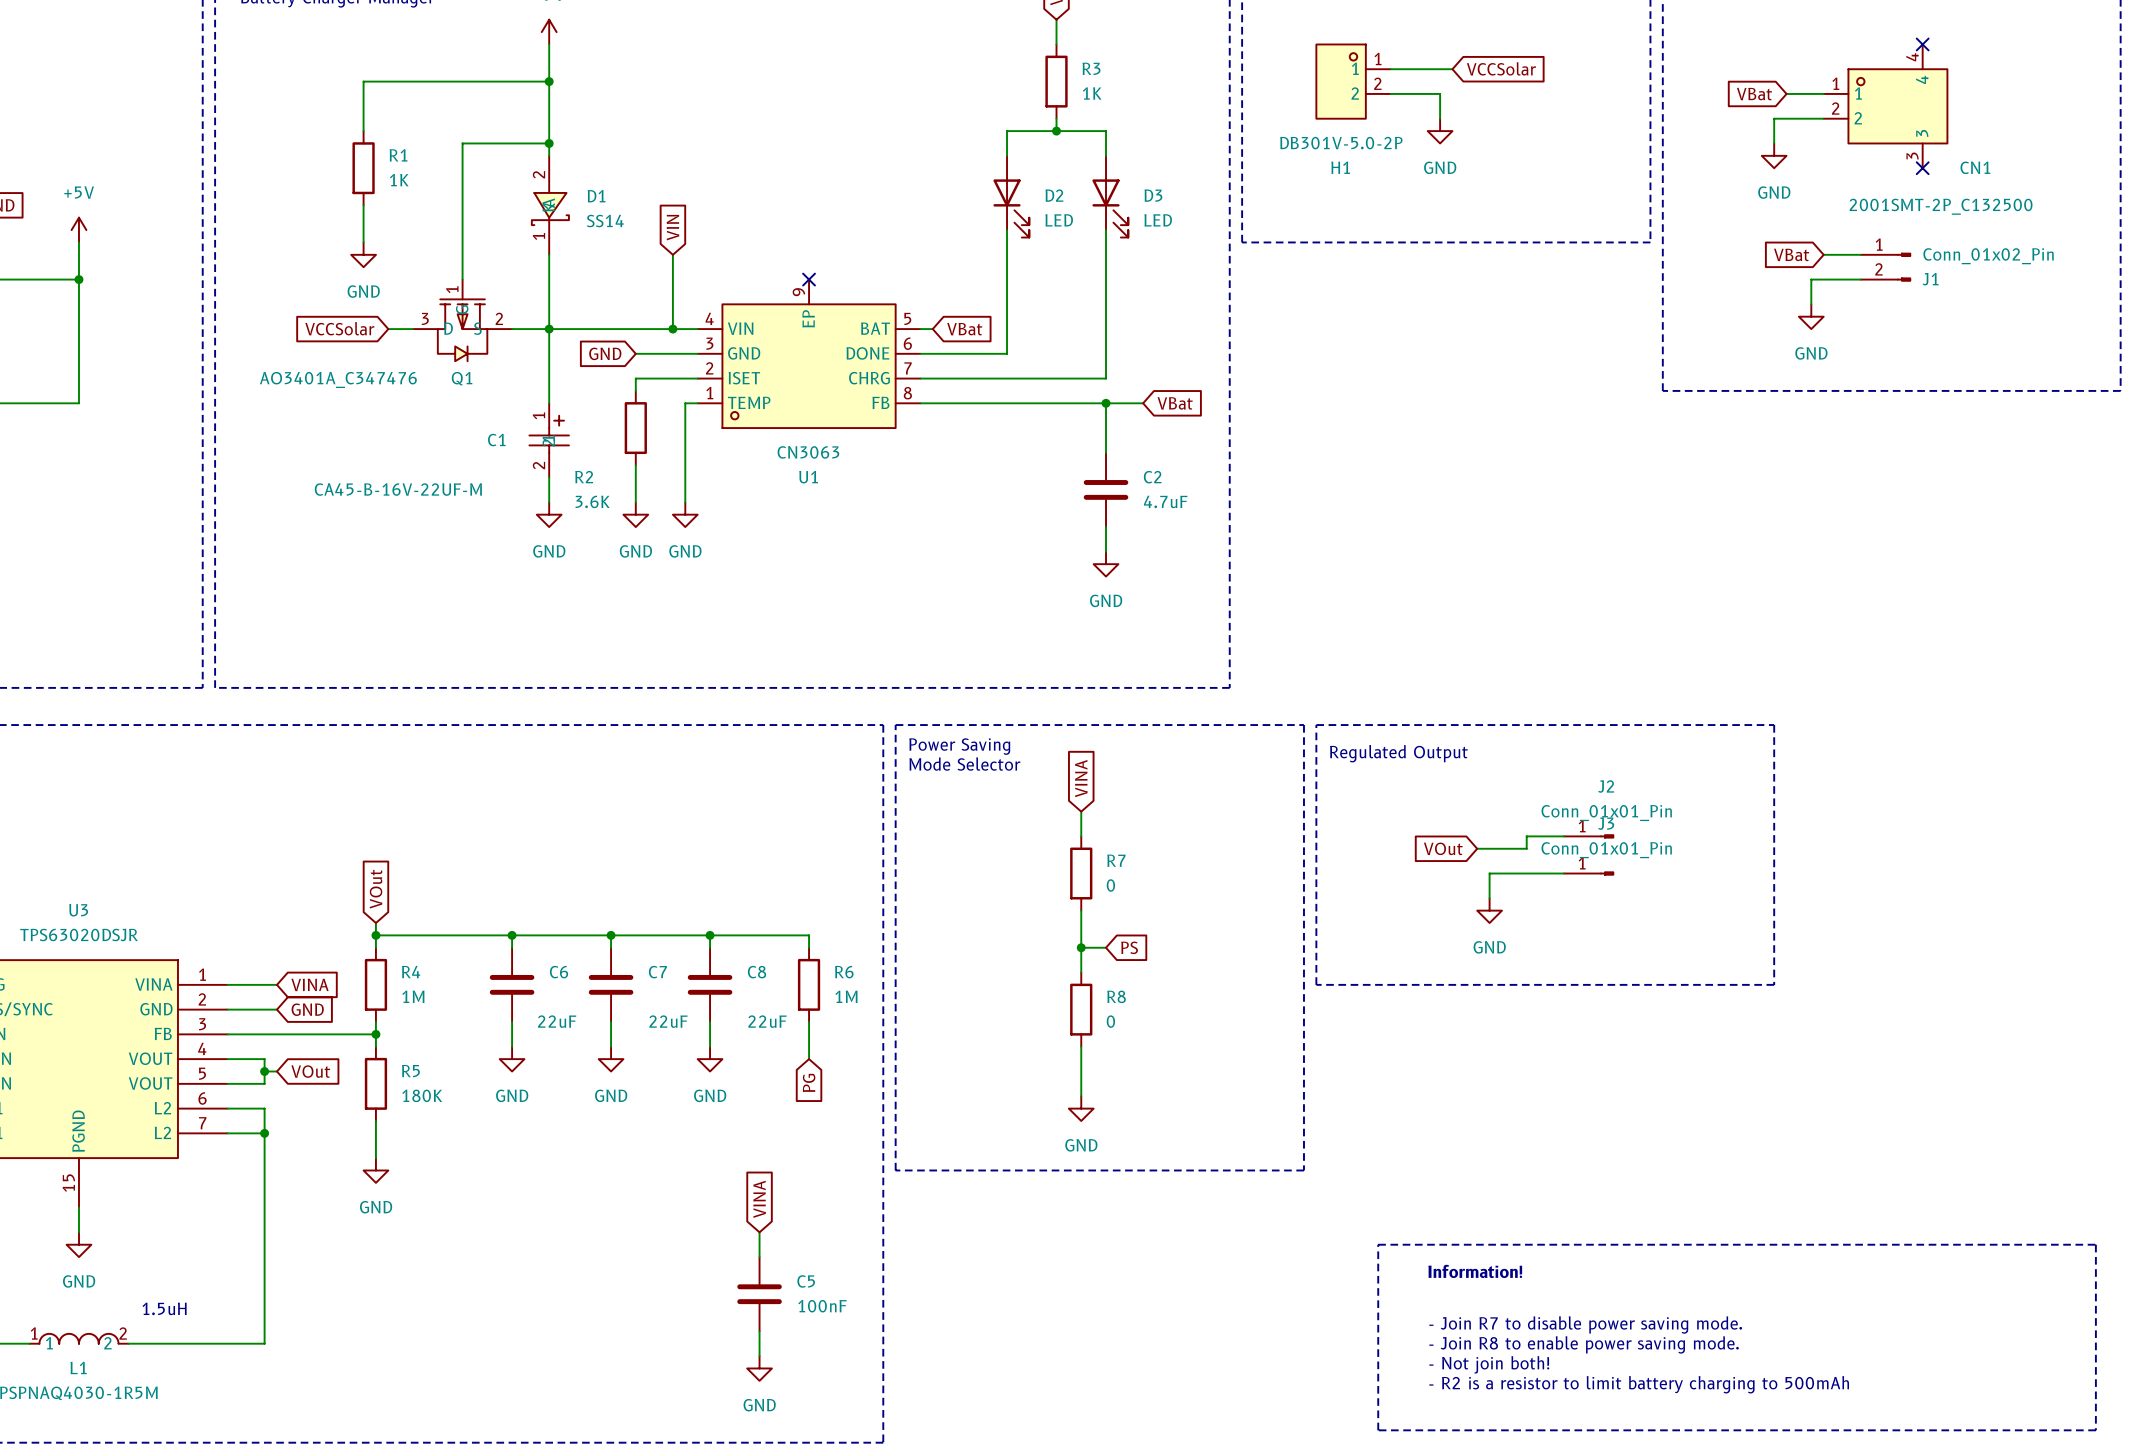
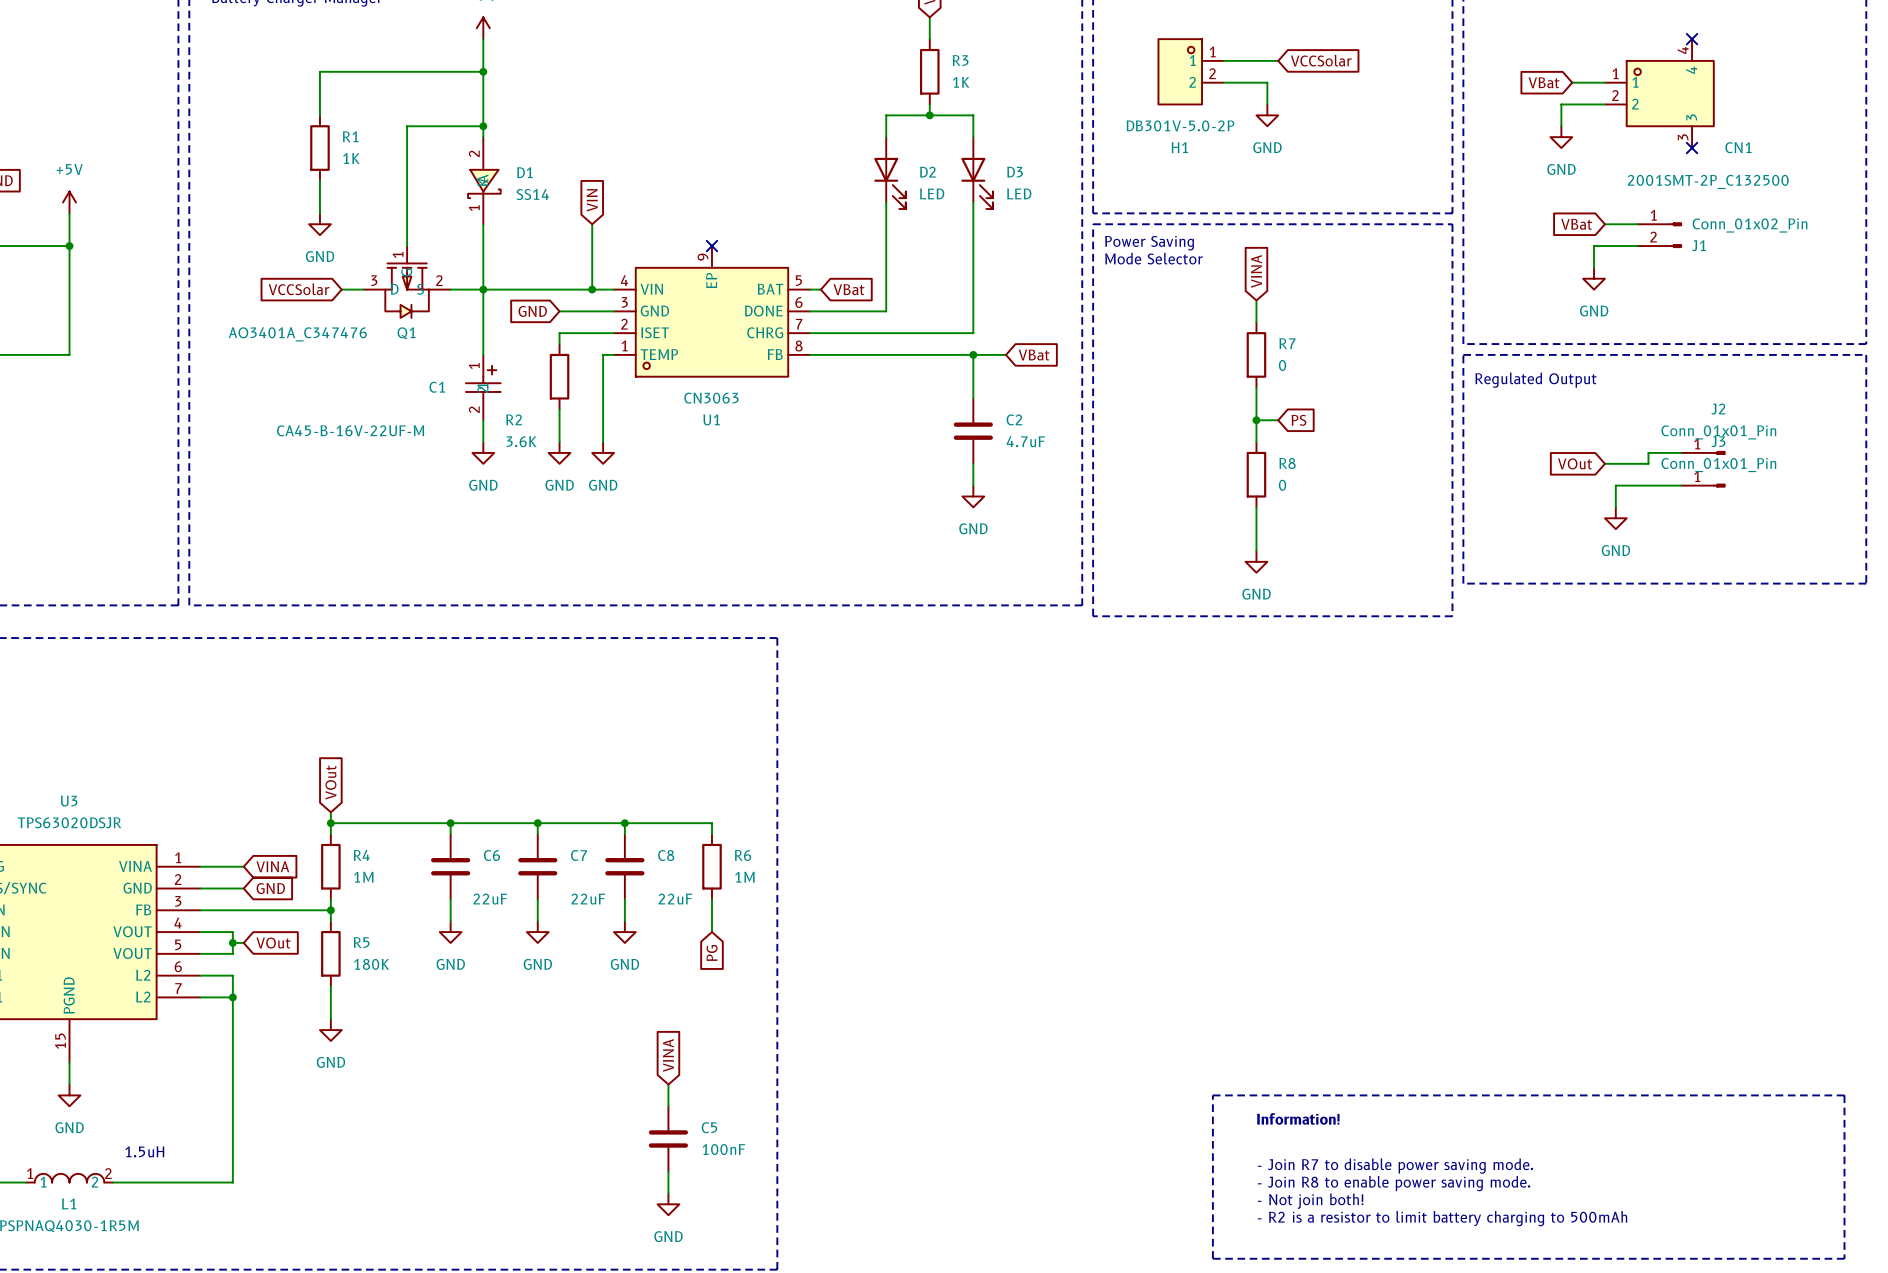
line: none -> (1093, 224) (1452, 224) (1452, 616) (1093, 616) (1093, 224)
text: none -> Power Saving (1149, 243)
text: none -> Mode Selector (1154, 258)
global label: none -> VINA (1256, 271)
wire: none -> (1256, 300) (1256, 322)
line: none -> (1463, 354) (1866, 354) (1866, 583) (1463, 583) (1463, 354)
text: none -> Regulated Output (1535, 380)
wire: none -> (1256, 387) (1256, 442)
wire: none -> (1256, 420) (1278, 420)
junction: none -> (1256, 420)
global label: none -> PS (1298, 420)
wire: none -> (1681, 452) (1648, 452) (1648, 463) (1604, 463)
global label: none -> VOut (1575, 463)
wire: none -> (1681, 485) (1615, 485) (1615, 507)
wire: none -> (1256, 507) (1256, 550)
power symbol: none -> GND (1615, 518)
power symbol: none -> GND (1256, 561)
line: (895, 725) (1303, 725) (1303, 1170) (895, 1170) (895, 725) -> none
line: (1316, 725) (1774, 725) (1774, 984) (1316, 984) (1316, 725) -> none
text: Power Saving (959, 746) -> none
text: Regulated Output (1398, 753) -> none
text: Mode Selector (964, 764) -> none
global label: VINA (1081, 778) -> none
wire: (1081, 811) (1081, 836) -> none
wire: (1563, 836) (1526, 836) (1526, 848) (1477, 848) -> none
J2 position: (1588, 836) -> (1703, 452)
global label: VOut (1443, 848) -> none
R7 position: (1081, 873) -> (1256, 354)
wire: (1563, 873) (1489, 873) (1489, 898) -> none
J3 position: (1588, 873) -> (1703, 485)
wire: (1081, 910) (1081, 972) -> none
power symbol: GND (1489, 910) -> none
wire: (1081, 947) (1106, 947) -> none
junction: (1081, 947) -> none
global label: PS (1129, 947) -> none
R8 position: (1081, 1009) -> (1256, 474)
wire: (1081, 1046) (1081, 1096) -> none
power symbol: GND (1081, 1108) -> none

